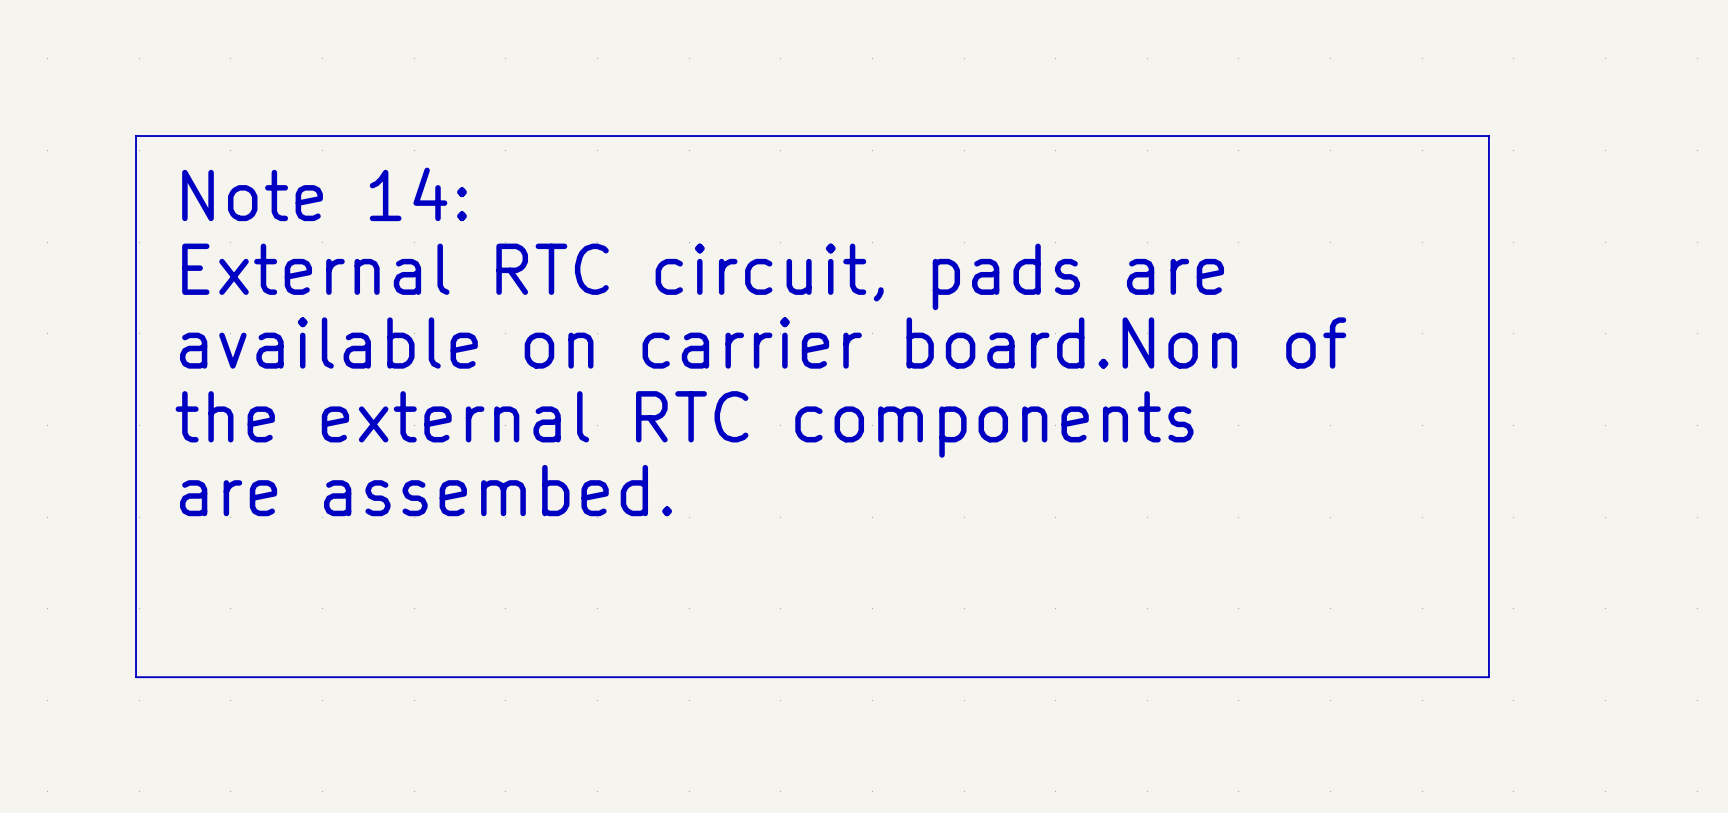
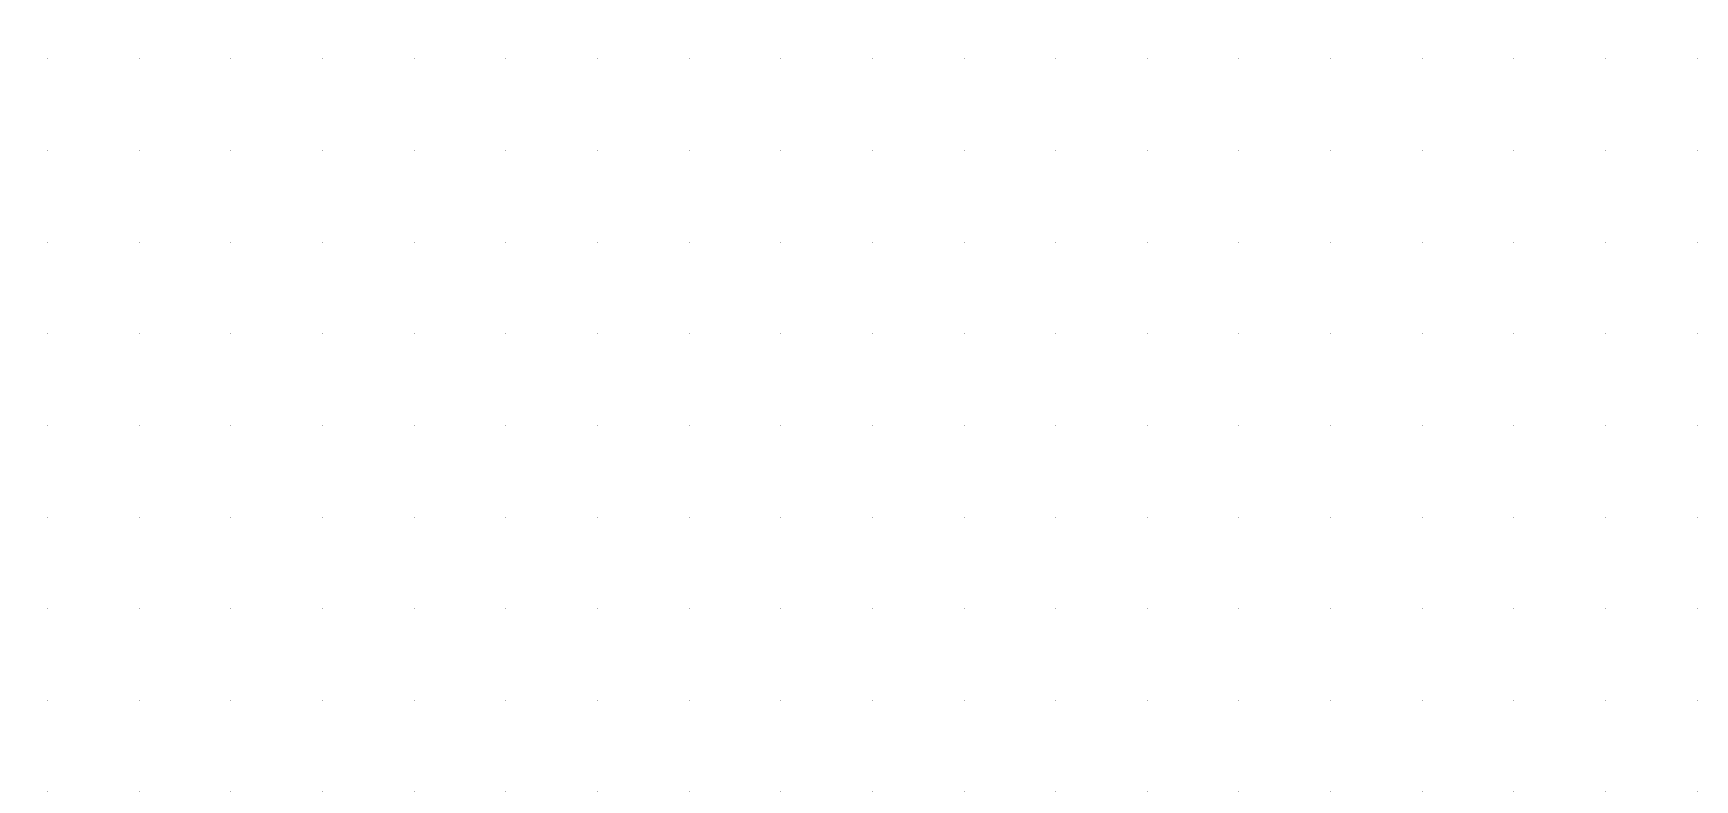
line: (136, 136) (1488, 136) (1488, 677) (136, 677) (136, 136) -> none
text: Note 14: (324, 194) -> none
text: External RTC circuit, pads are (703, 276) -> none
text: available on carrier board.Non of (763, 343) -> none
text: the external RTC components (684, 424) -> none
text: are assembed. (426, 490) -> none

